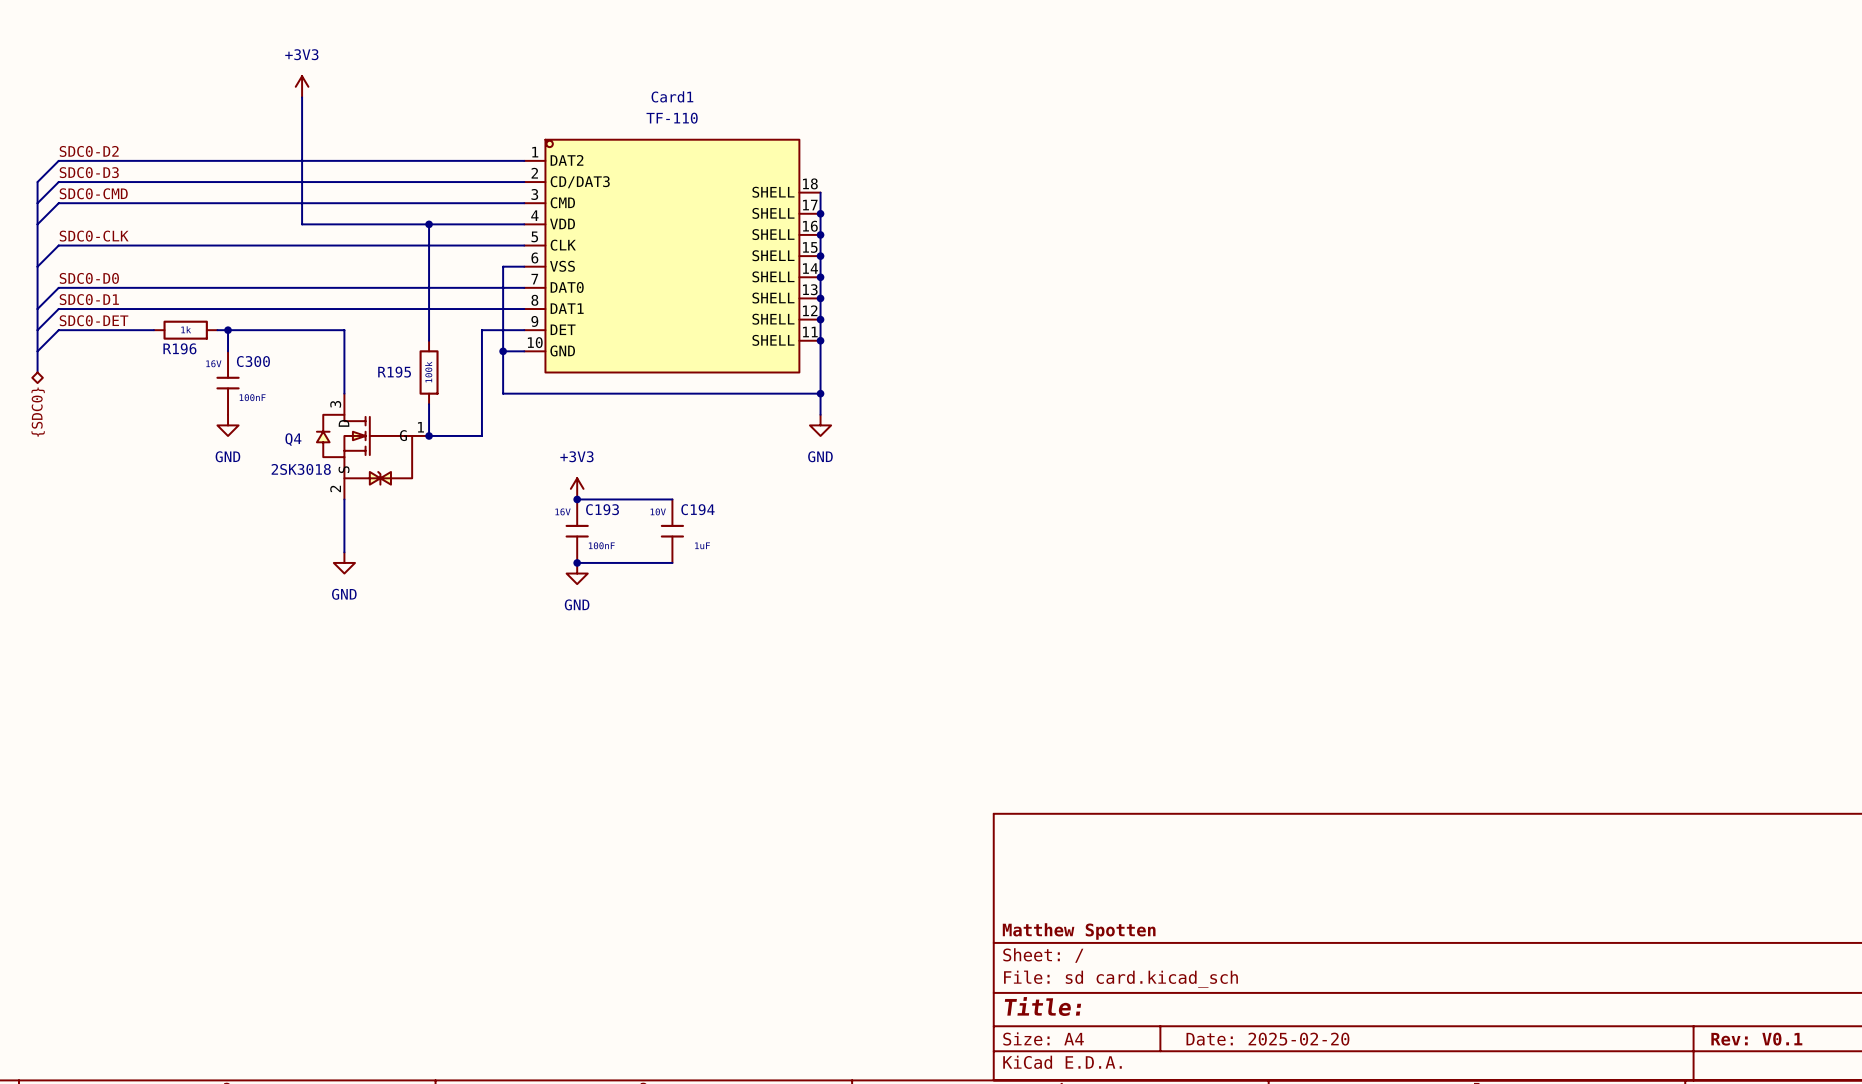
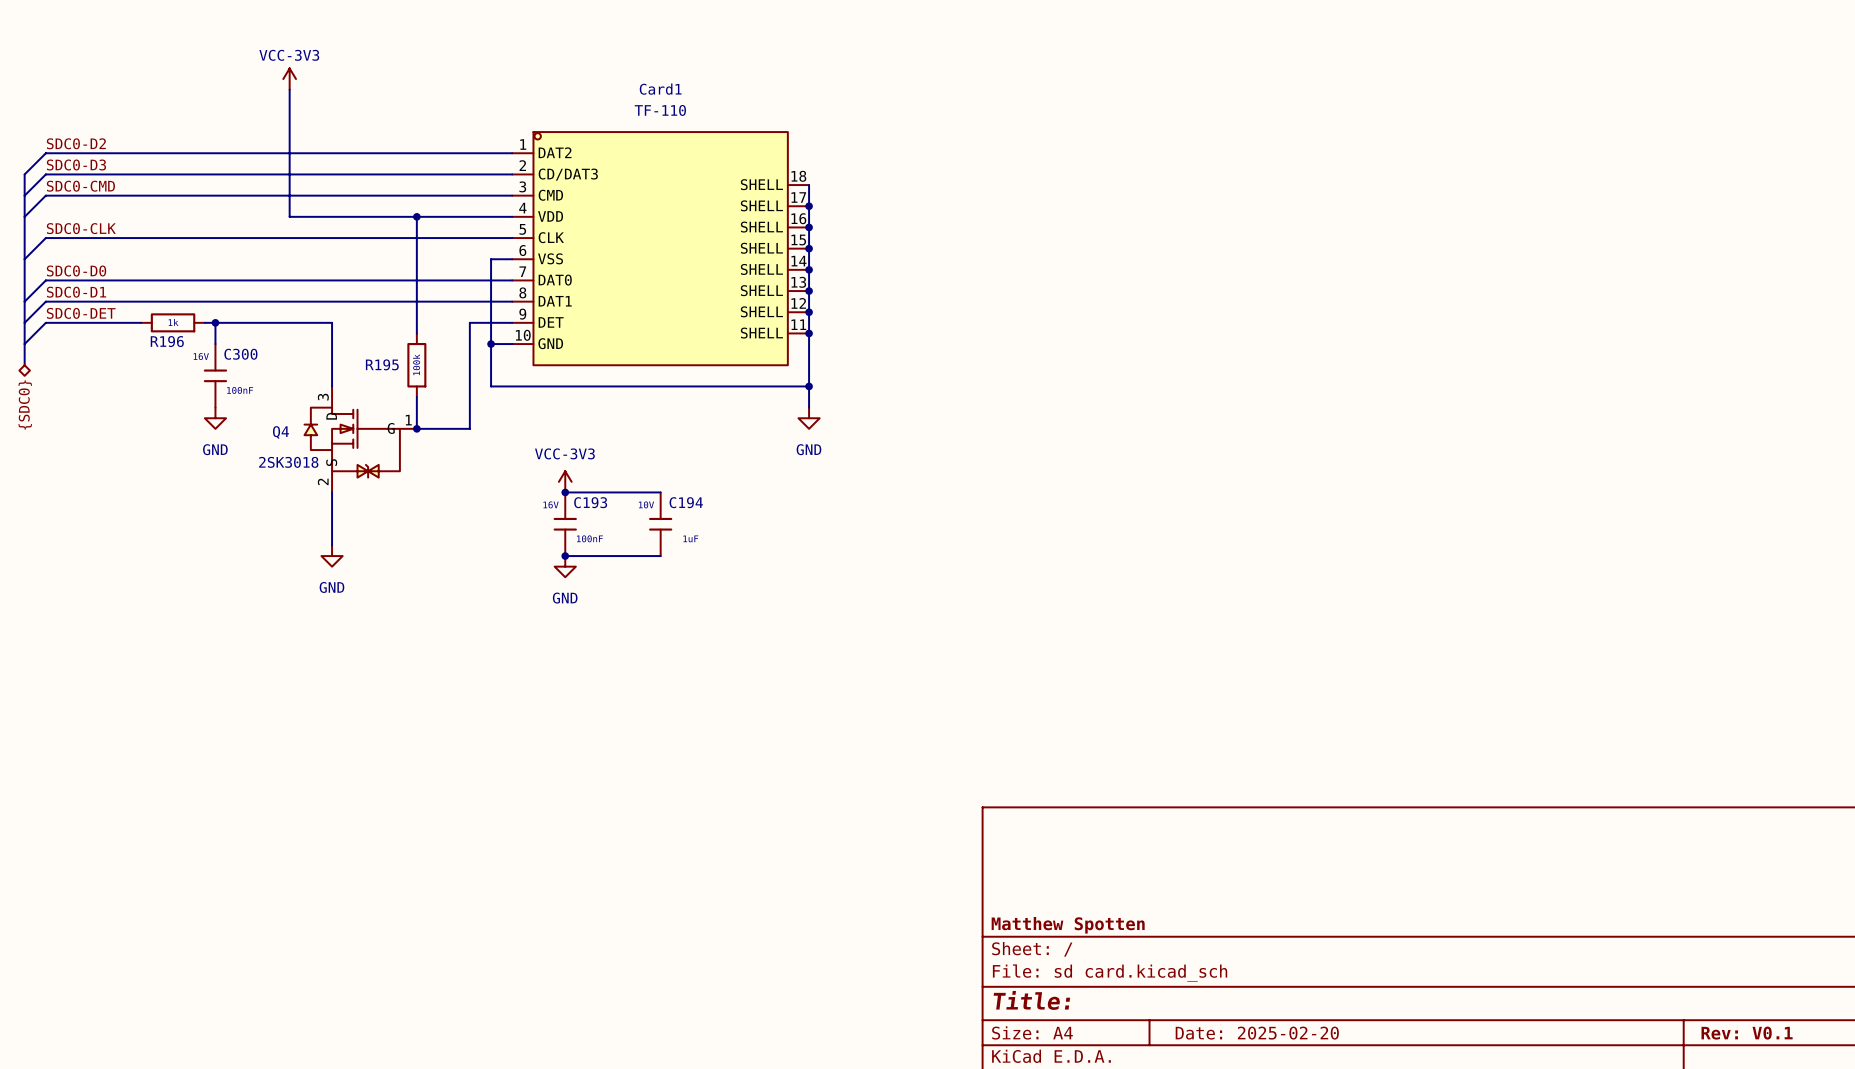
power symbol: +3V3 (302, 86) -> VCC-3V3 (289, 79)
power symbol: +3V3 (577, 488) -> VCC-3V3 (565, 481)

